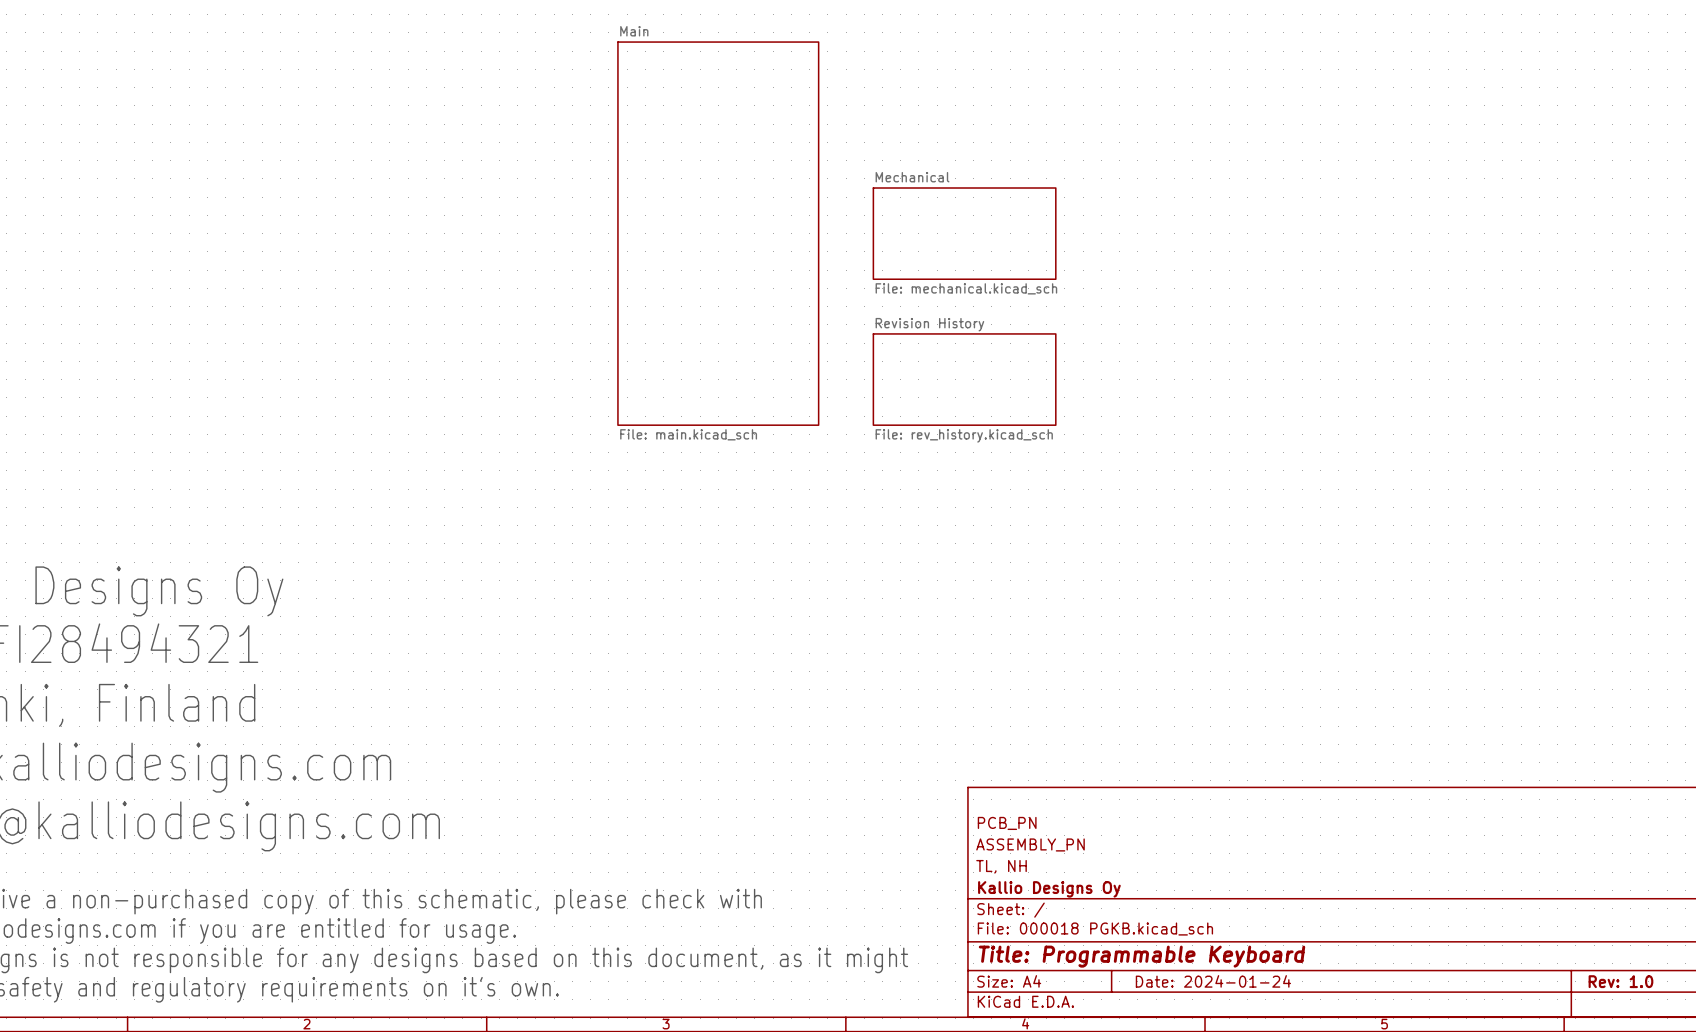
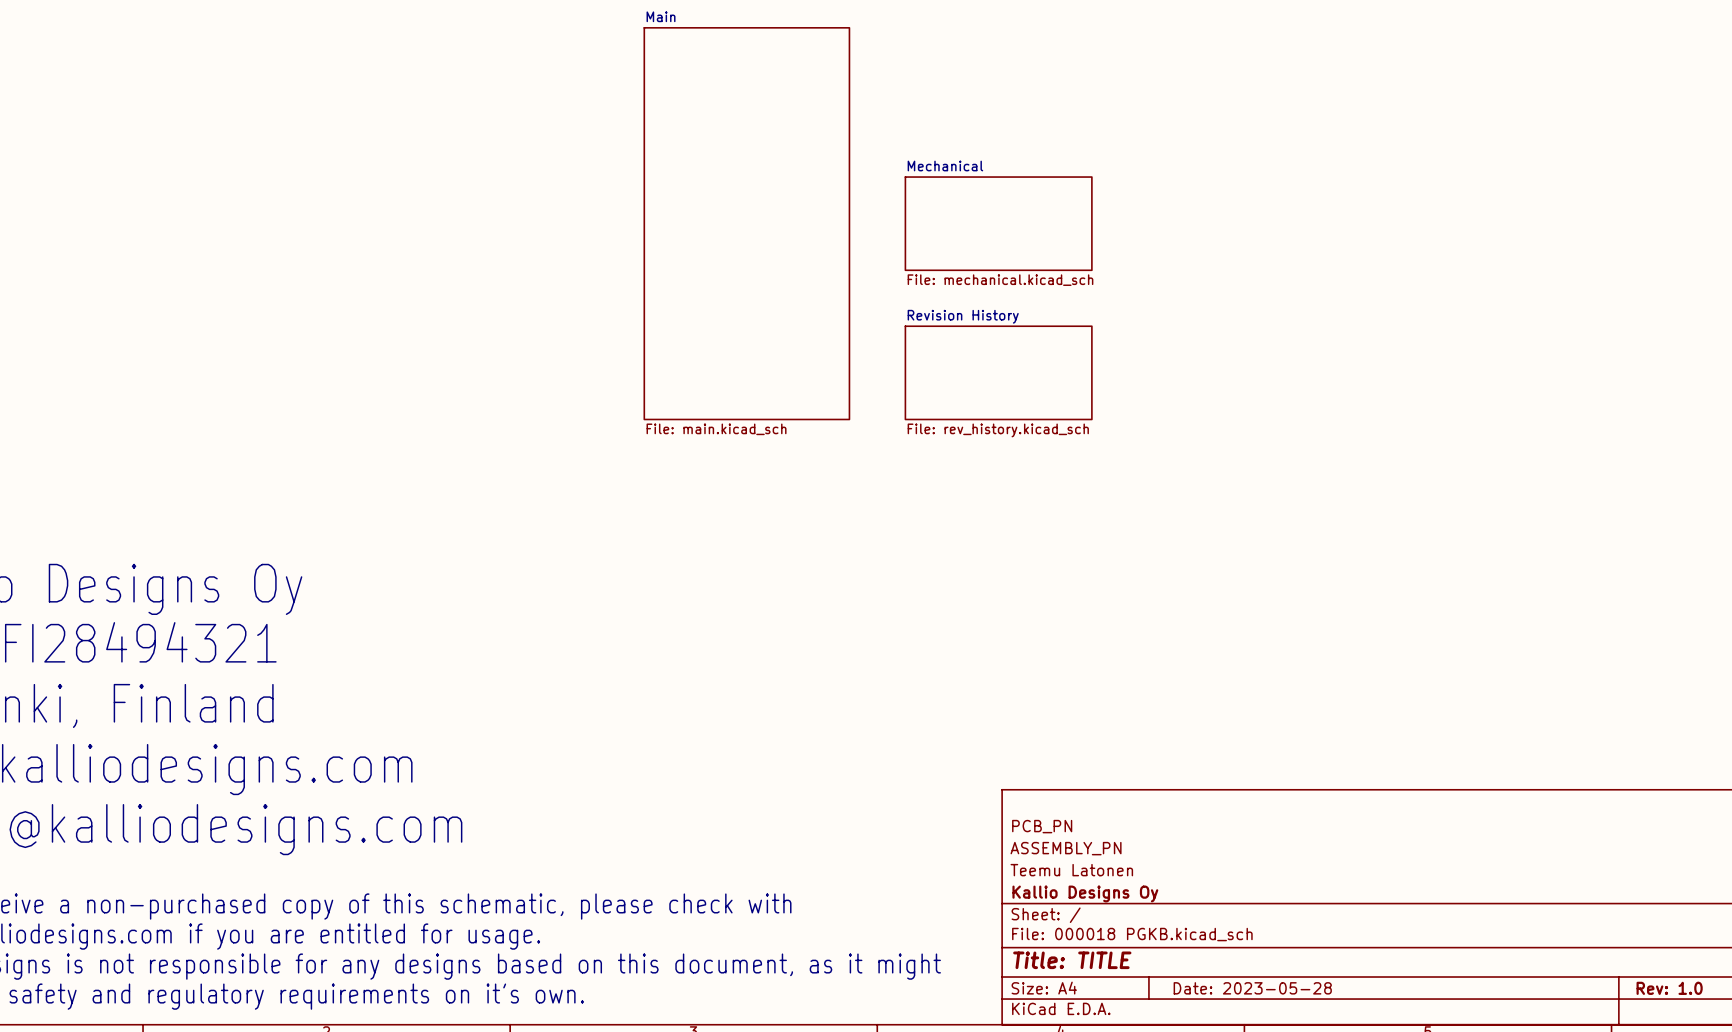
title block: TL, NH (1001, 866) -> Teemu Latonen (1071, 870)
title block: Title: Programmable Keyboard (1141, 956) -> Title: TITLE (1072, 960)
title block: Date: 2024-01-24 (1213, 981) -> Date: 2023-05-28 (1252, 988)

